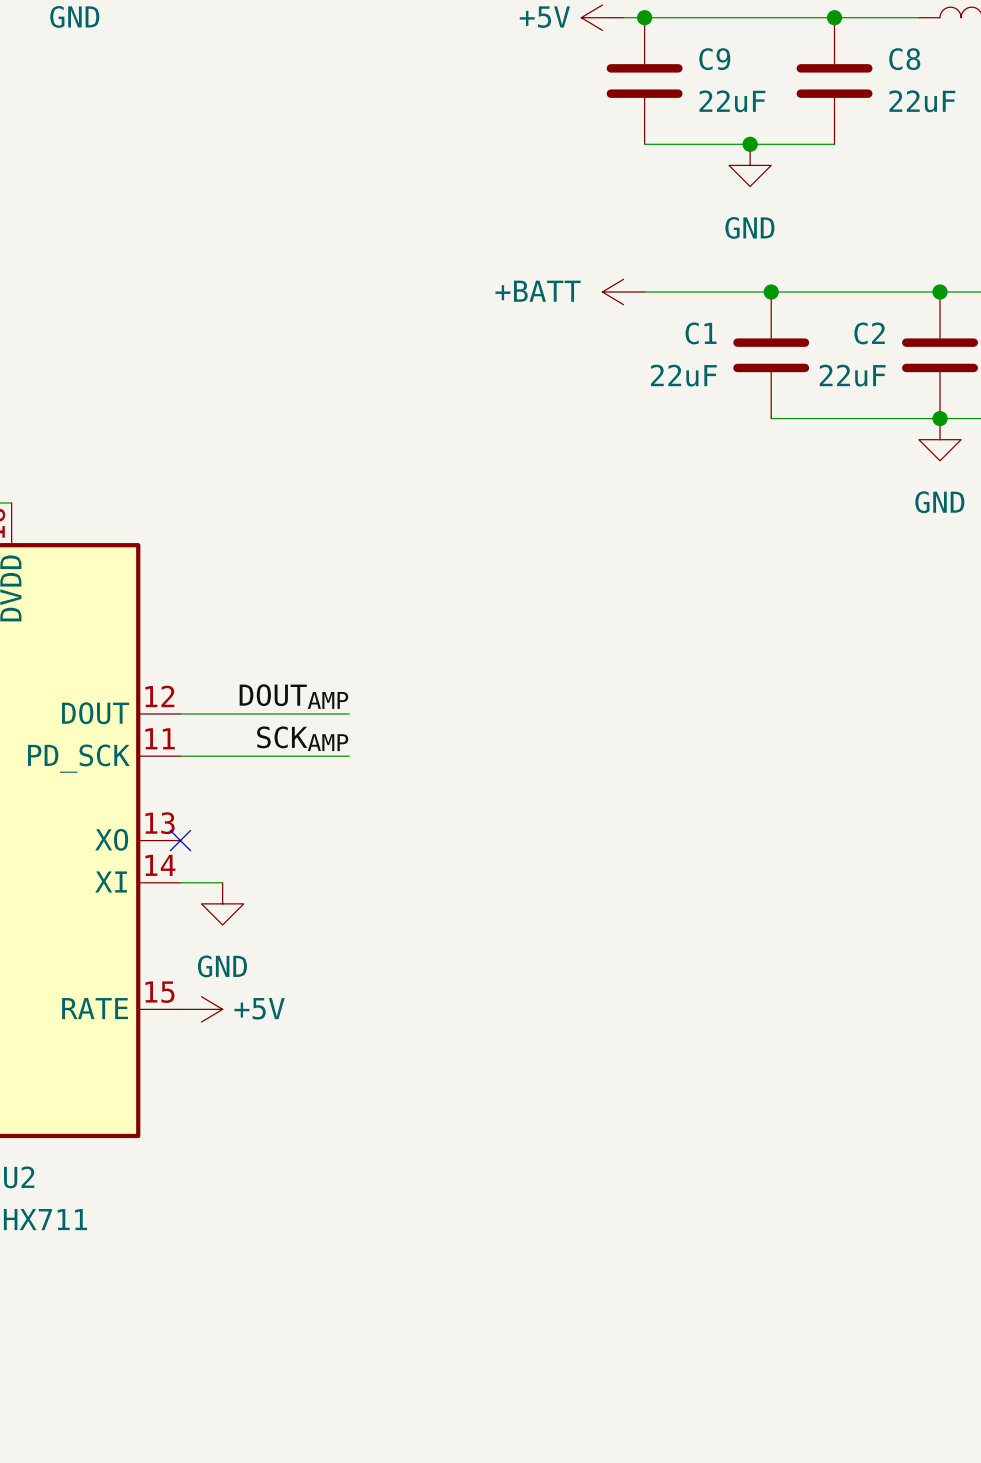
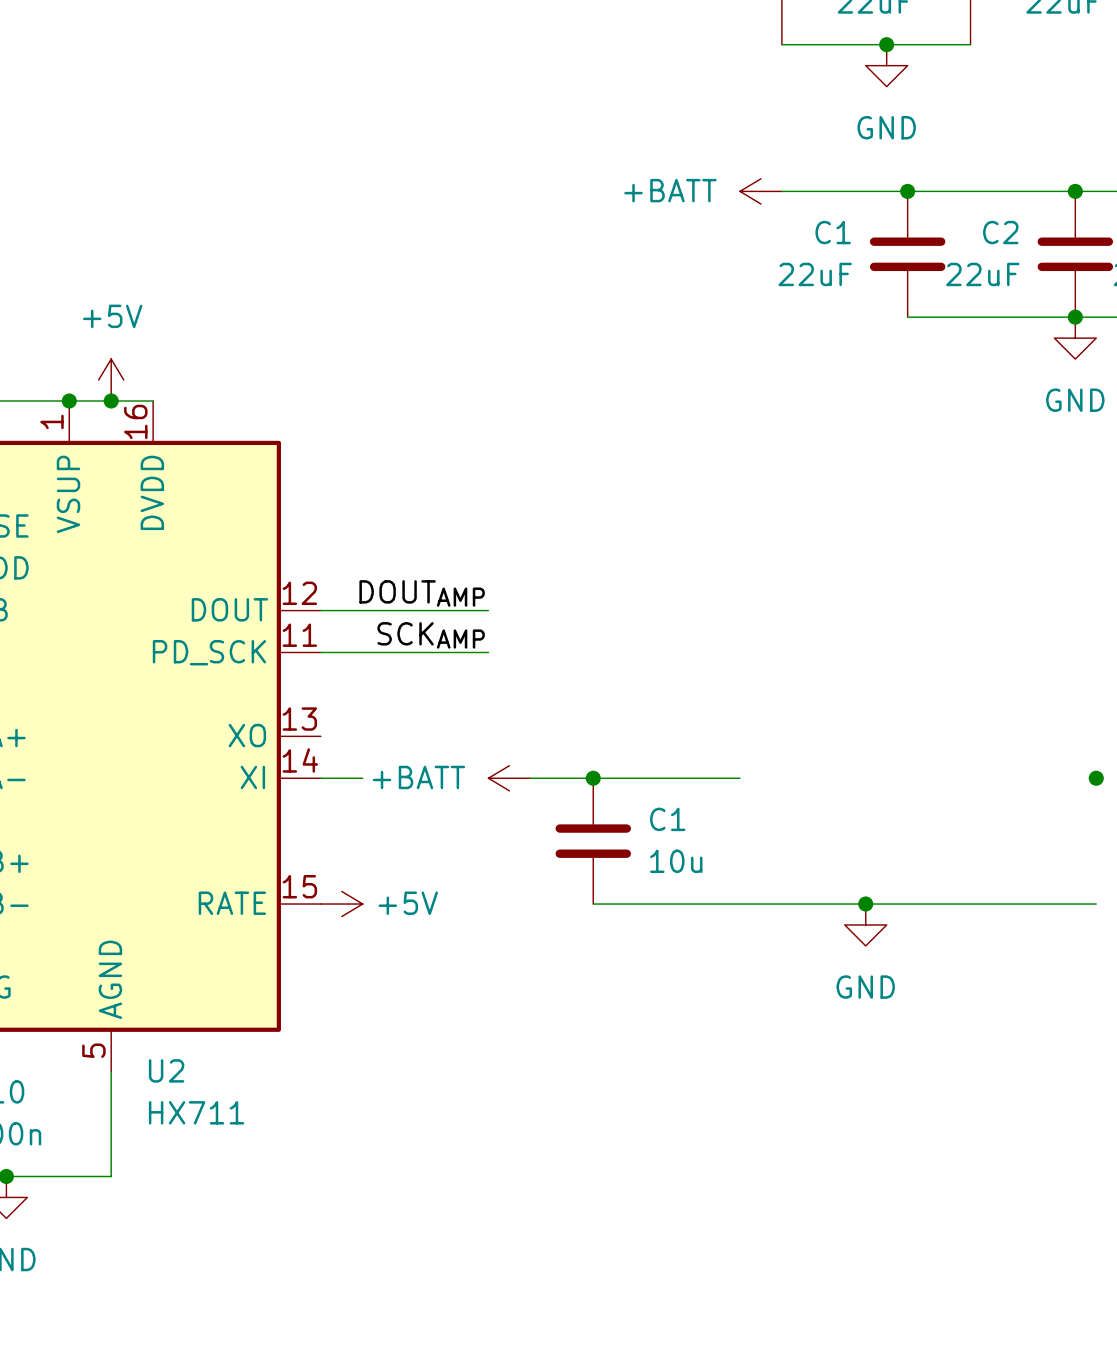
no-connect mark: (180, 840) -> none
power symbol: none -> +BATT (509, 778)
wire: none -> (530, 778) (739, 778)
junction: none -> (593, 778)
junction: none -> (1096, 778)
power symbol: GND (222, 903) -> none
C1: none -> 10u (593, 841)
wire: none -> (593, 904) (1096, 904)
junction: none -> (865, 904)
power symbol: none -> GND (865, 924)

